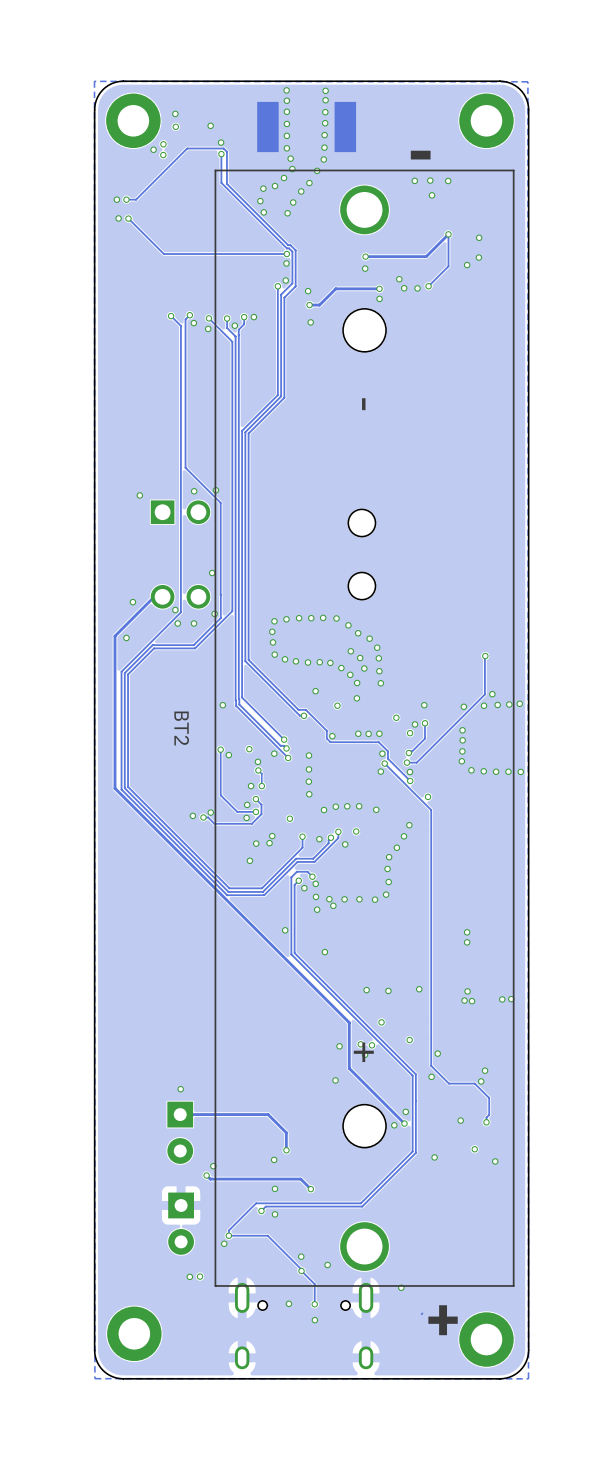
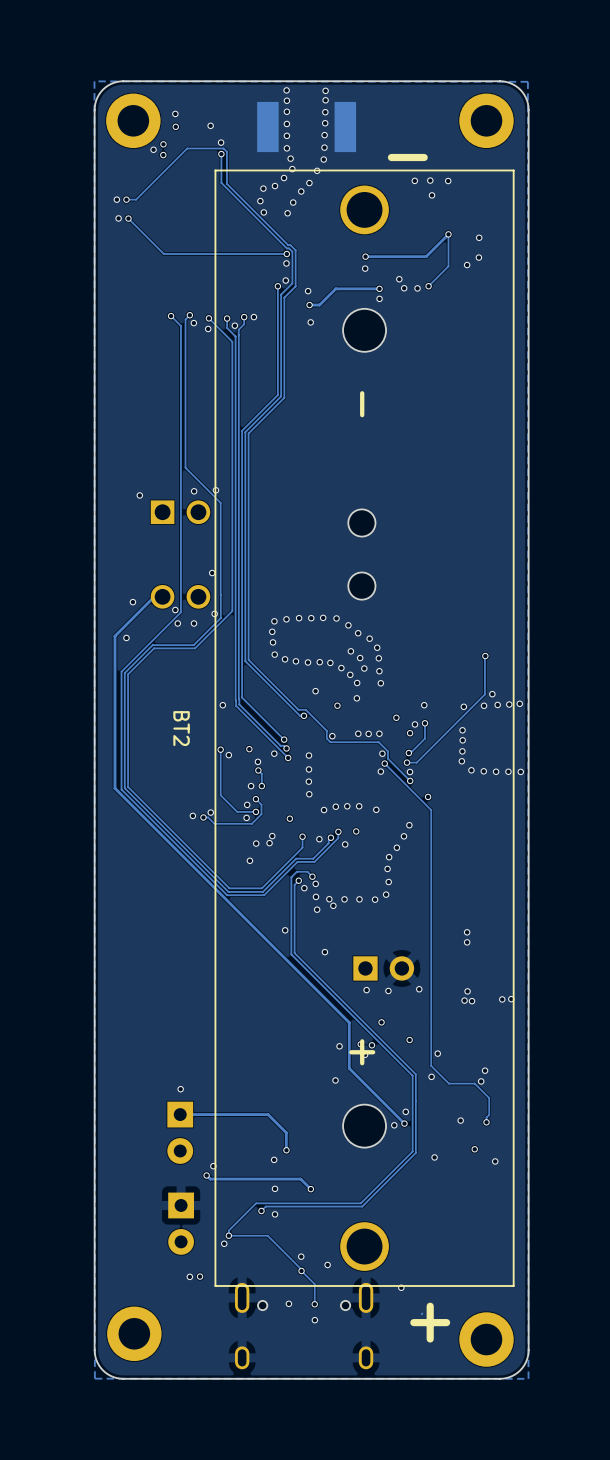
part: none -> (383, 968)

